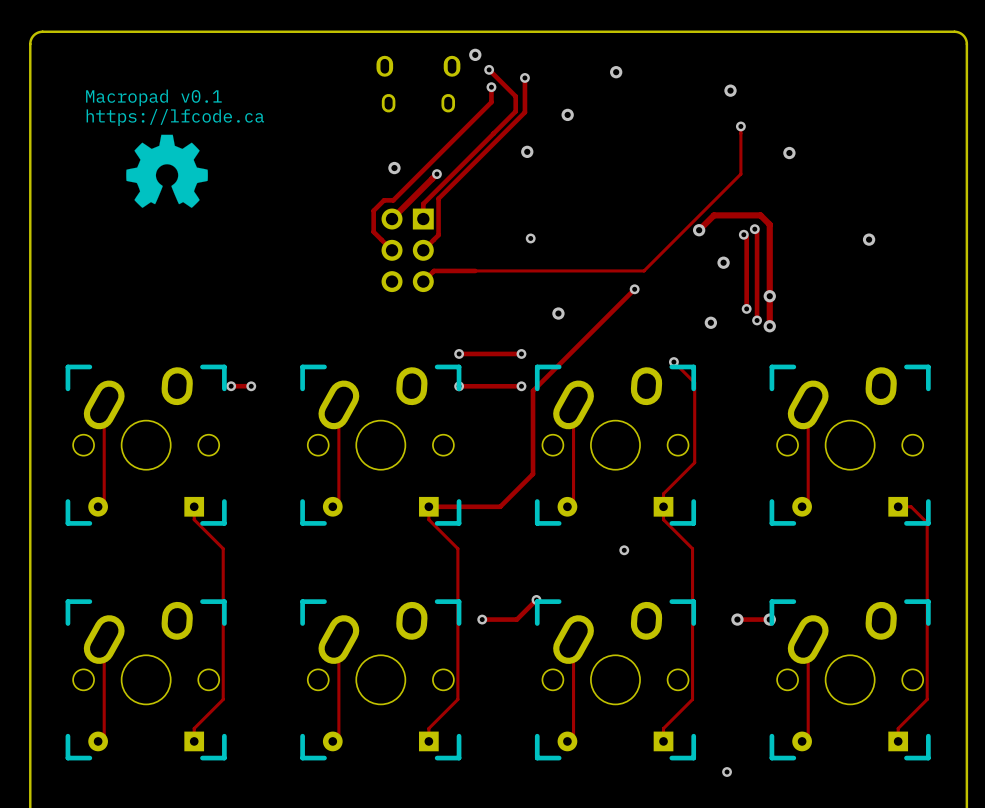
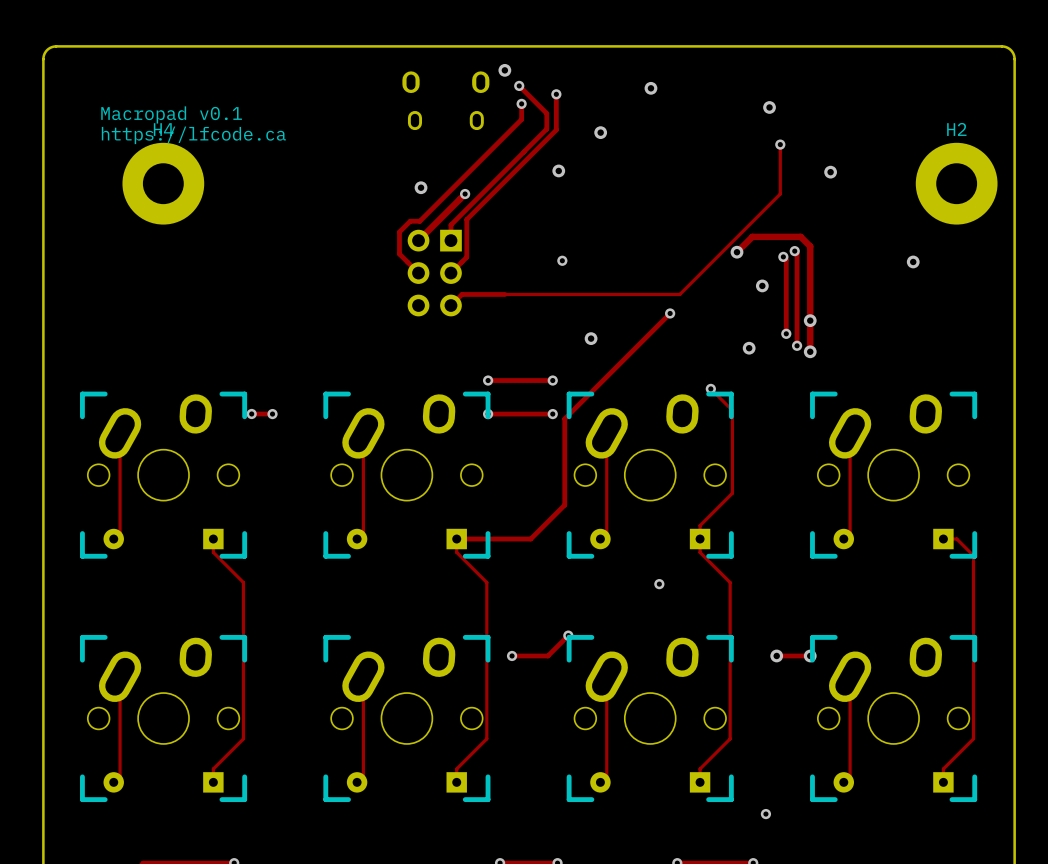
drawing: [126, 134, 208, 208] -> none
H4: none -> (163, 183)
H2: none -> (956, 183)

